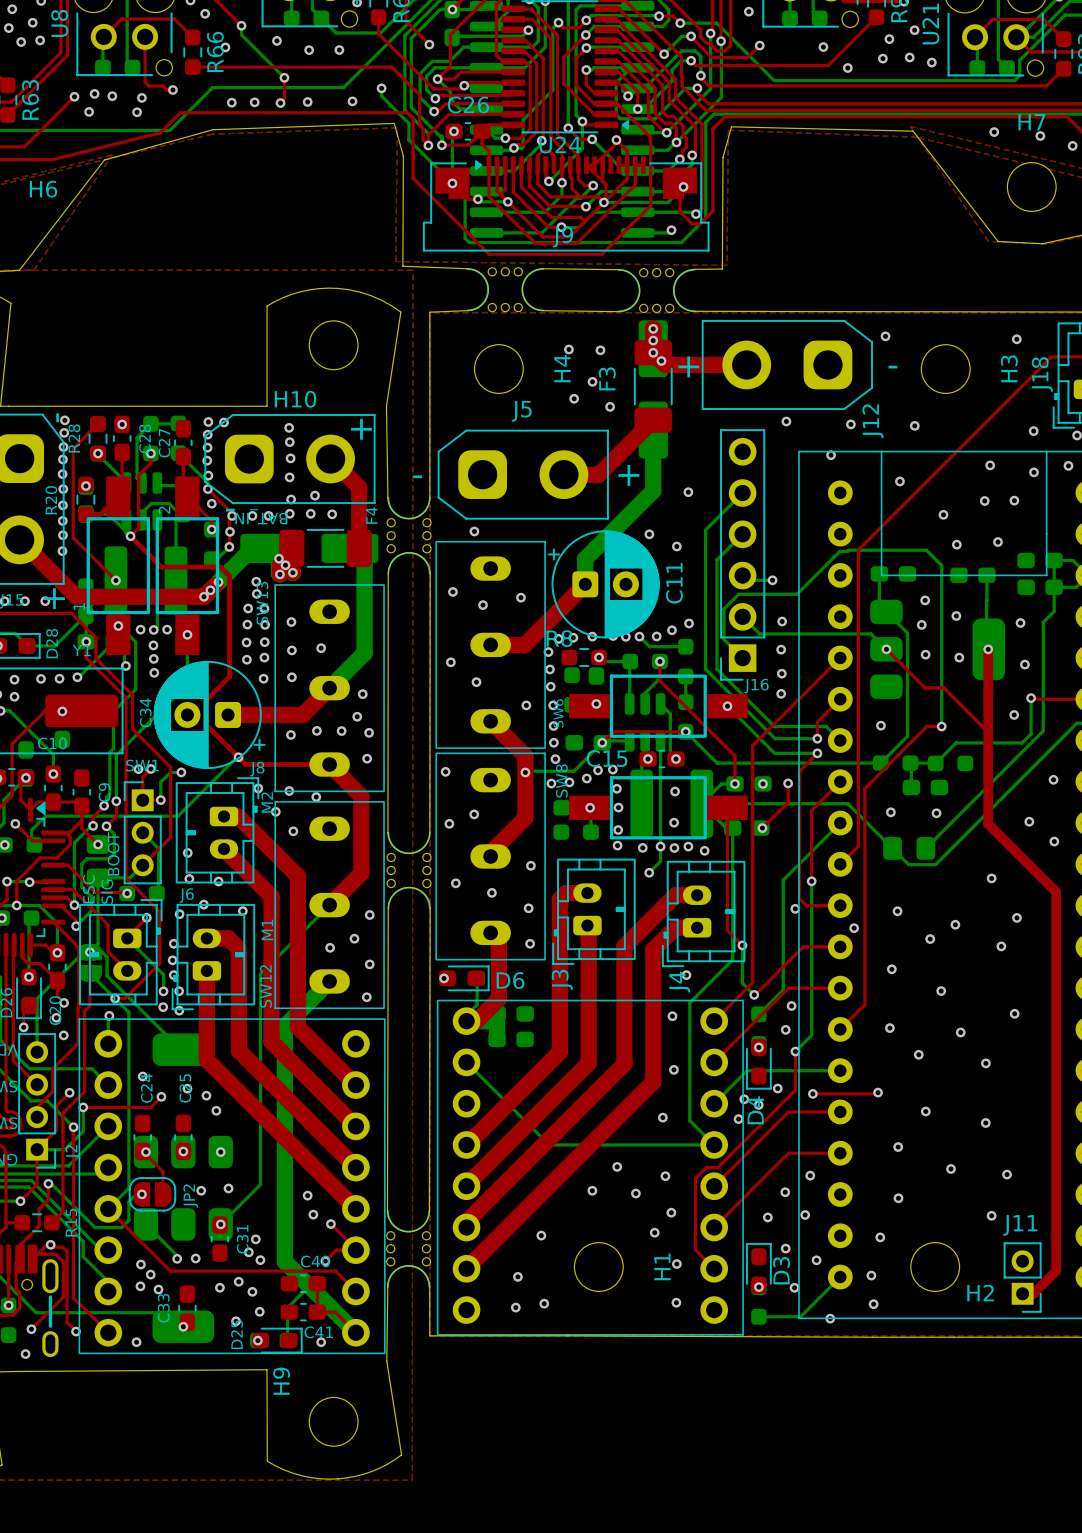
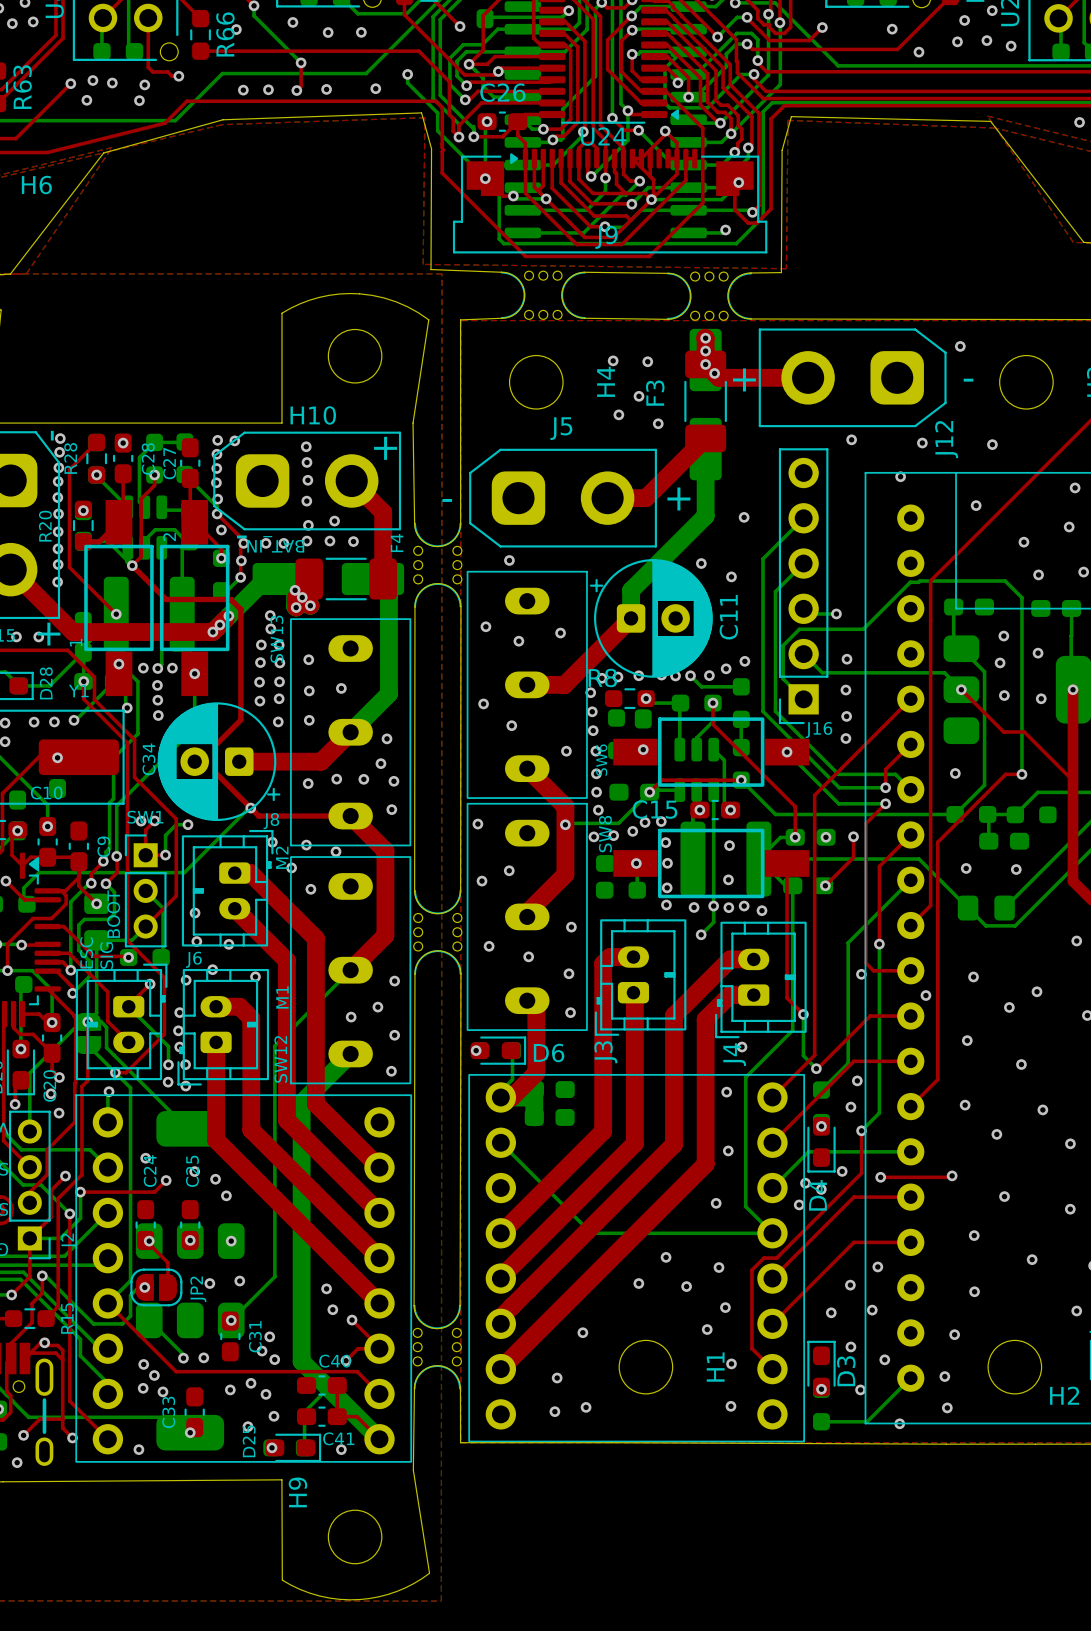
top track: (55, 1254) (63, 1261) (63, 1297) (46, 1314) -> (50, 1353) (55, 1353) (62, 1359)
top track: none -> (39, 1419) (62, 1419)

